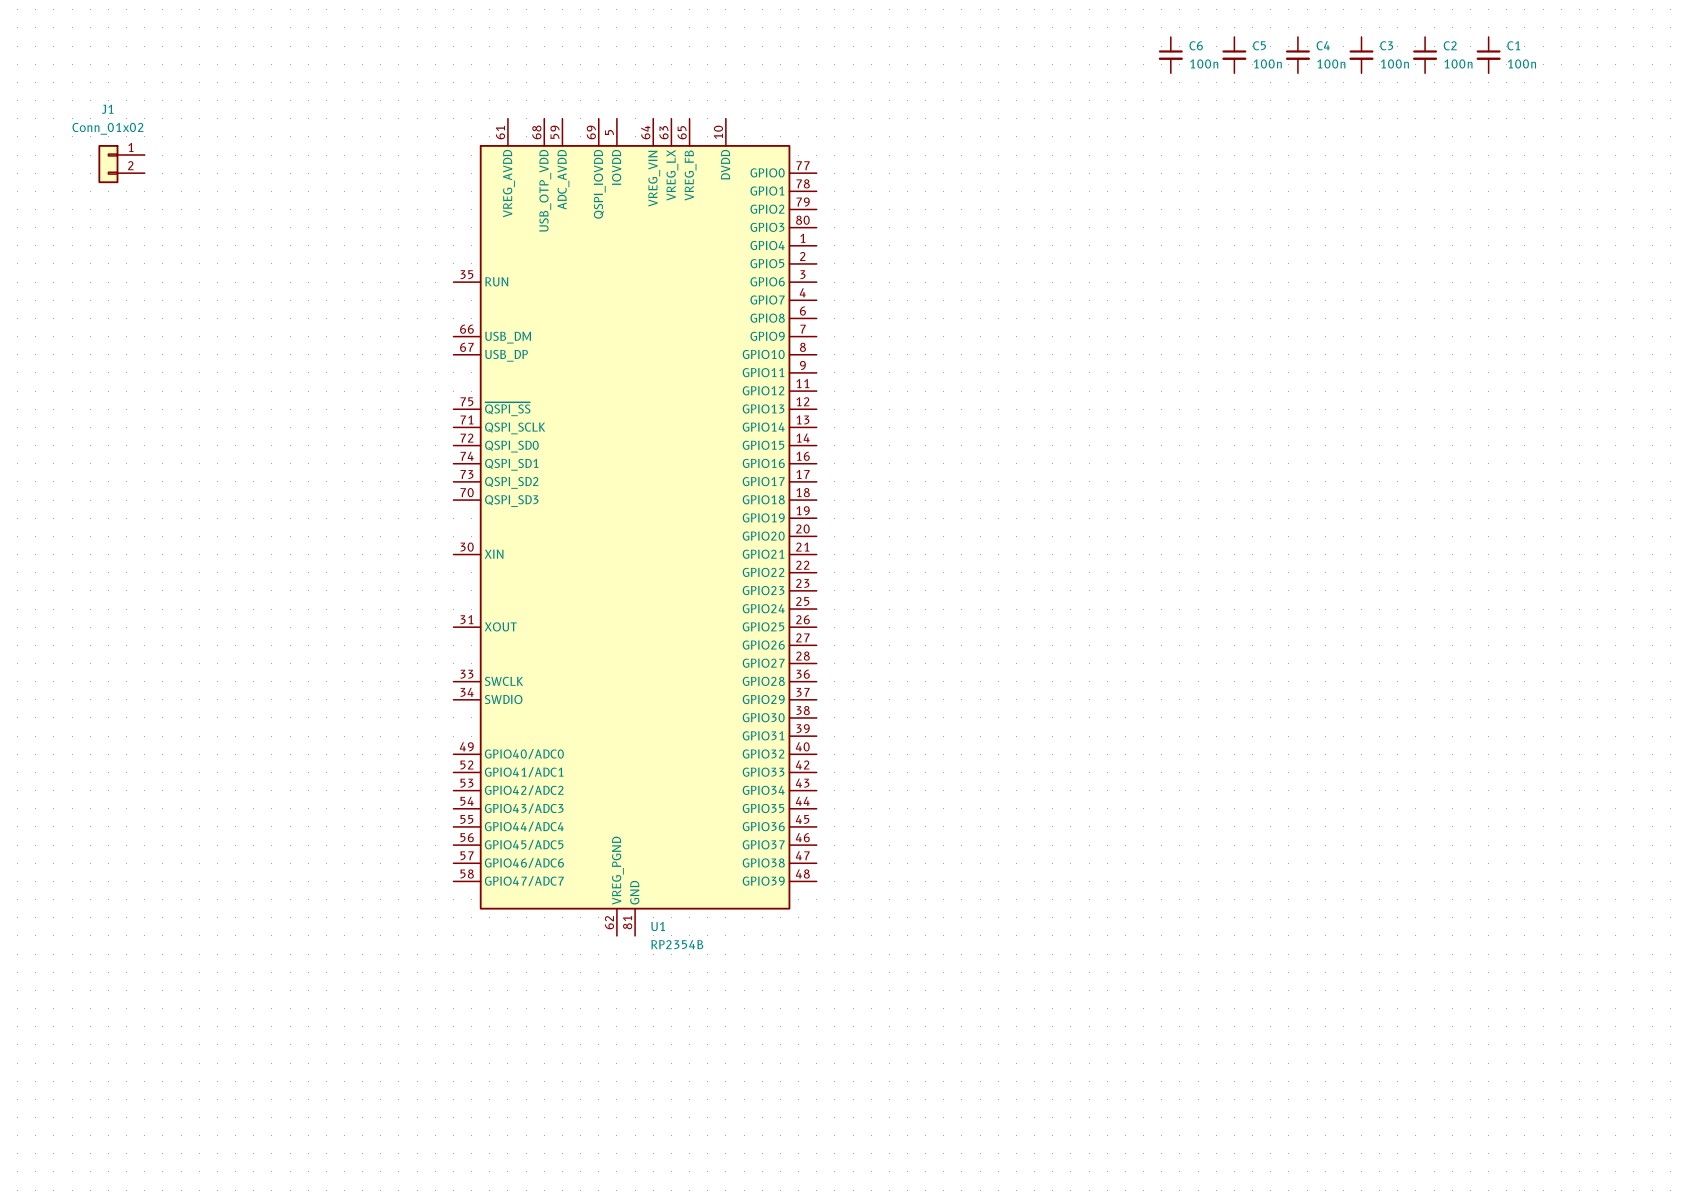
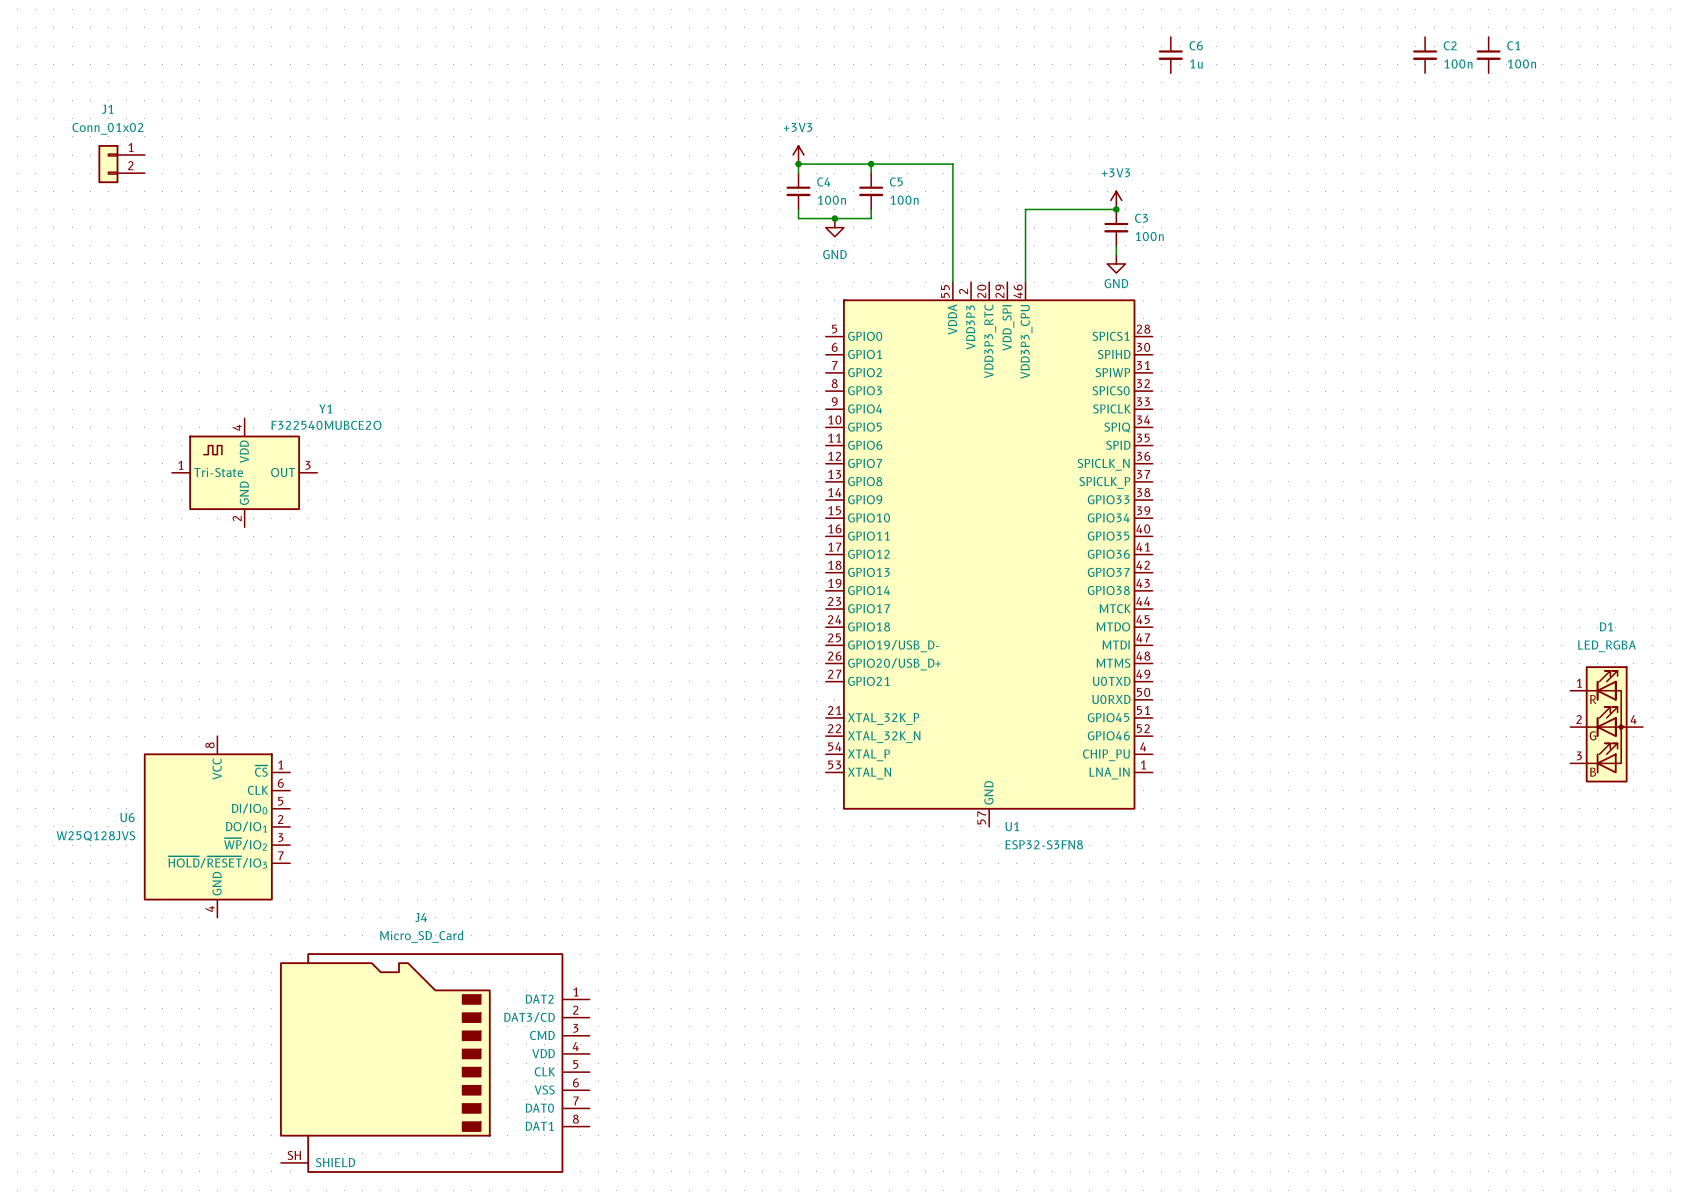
C5 position: (1234, 55) -> (871, 191)
C4 position: (1297, 55) -> (798, 191)
C3 position: (1361, 55) -> (1116, 227)
C6 value: 100n (1204, 63) -> 1u (1196, 63)
U1 symbol: [453, 118, 817, 936] -> [825, 282, 1153, 827]
power symbol: none -> +3V3 (798, 155)
junction: none -> (798, 164)
wire: none -> (871, 164) (871, 173)
junction: none -> (871, 164)
wire: none -> (798, 173) (798, 164) (952, 164) (952, 282)
power symbol: none -> +3V3 (1116, 200)
wire: none -> (798, 209) (798, 218) (871, 218) (871, 209)
wire: none -> (1116, 209) (1025, 209) (1025, 282)
junction: none -> (1116, 209)
junction: none -> (834, 218)
power symbol: none -> GND (834, 227)
wire: none -> (1116, 245) (1116, 254)
power symbol: none -> GND (1116, 263)
Y1: none -> F322540MUBCE2O (244, 472)
D1: none -> LED_RGBA (1606, 724)
U6: none -> W25Q128JVS (216, 826)
U1 name position: U1 (658, 926) -> U1 (1012, 826)
U1 value: RP2354B (677, 944) -> ESP32-S3FN8 (1044, 844)
J4: none -> Micro_SD_Card (434, 1063)

